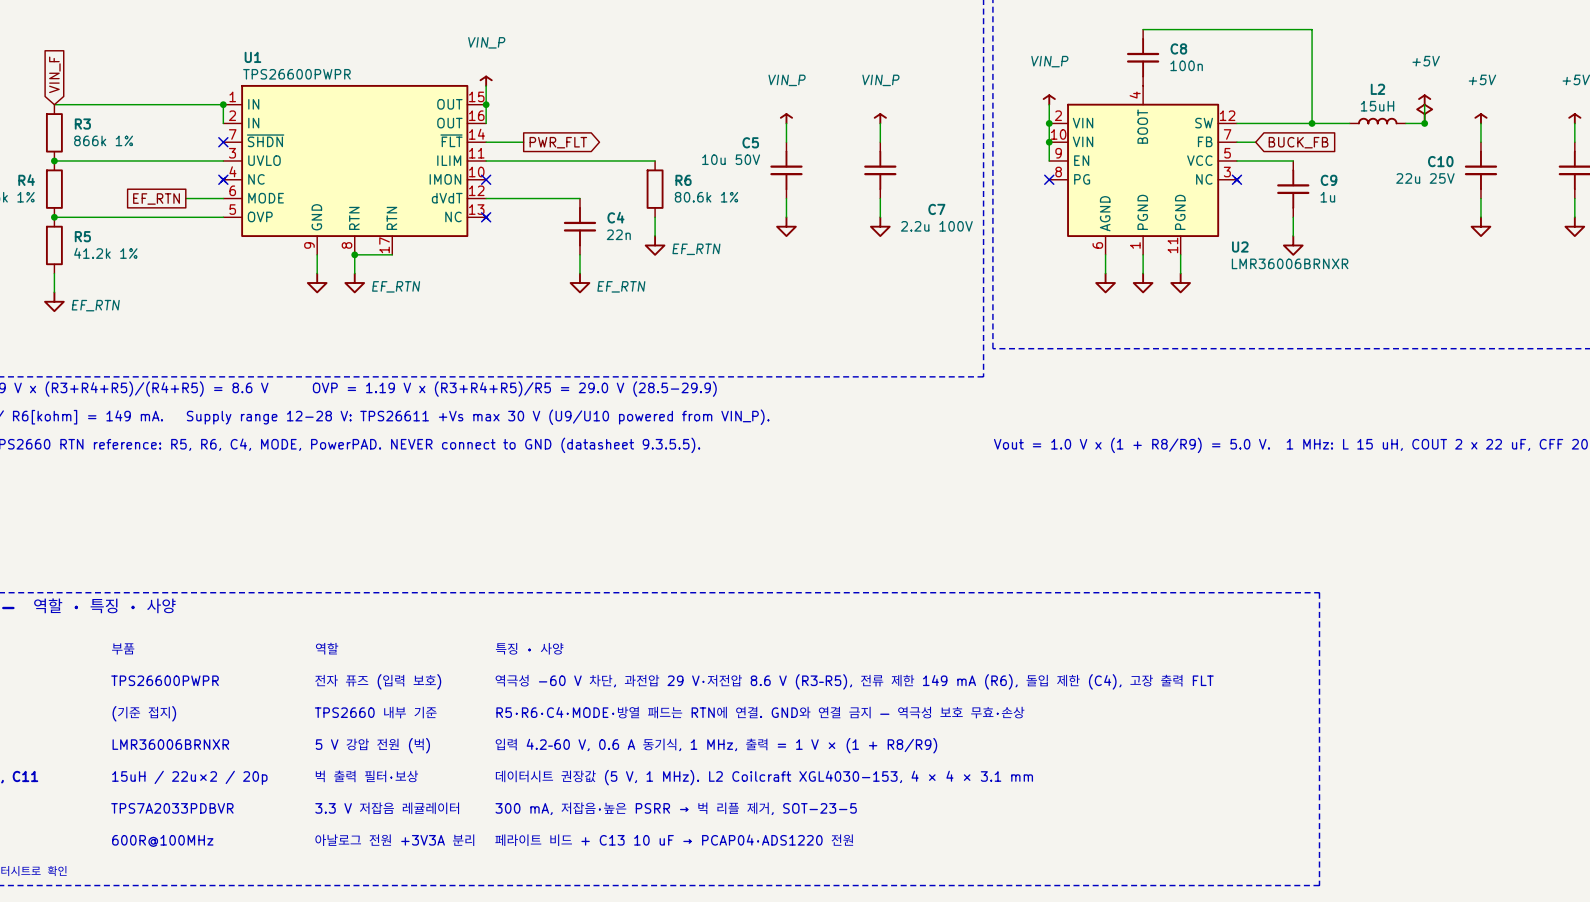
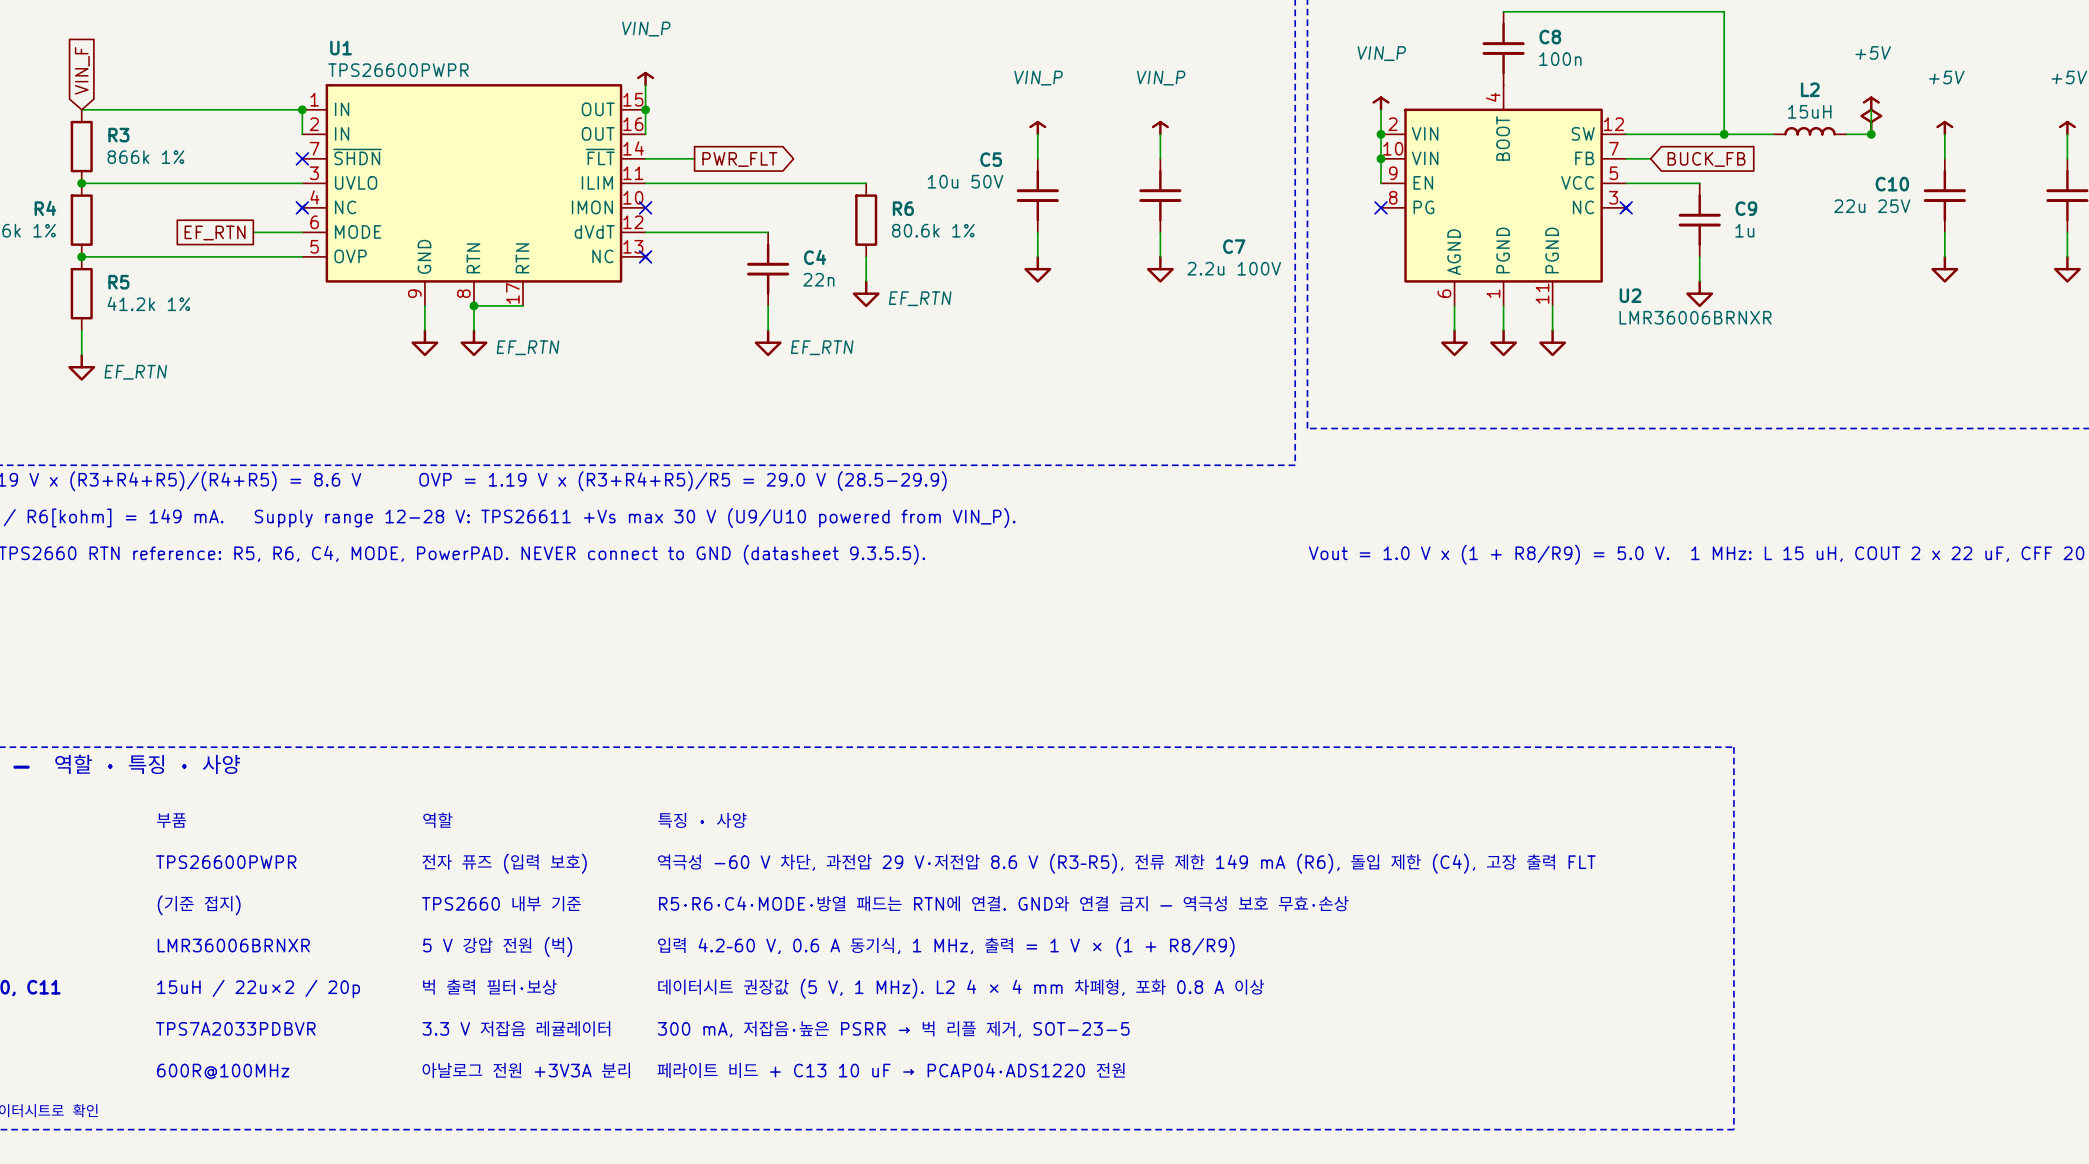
text: 데이터시트 권장값 (5 V, 1 MHz). L2 Coilcraft XGL4030-153, 4 × 4 × 3.1 mm (764, 777) -> 데이터시트 권장값 (5 V, 1 MHz). L2 4 × 4 mm 차폐형, 포화 0.8 A 이상 (961, 988)

